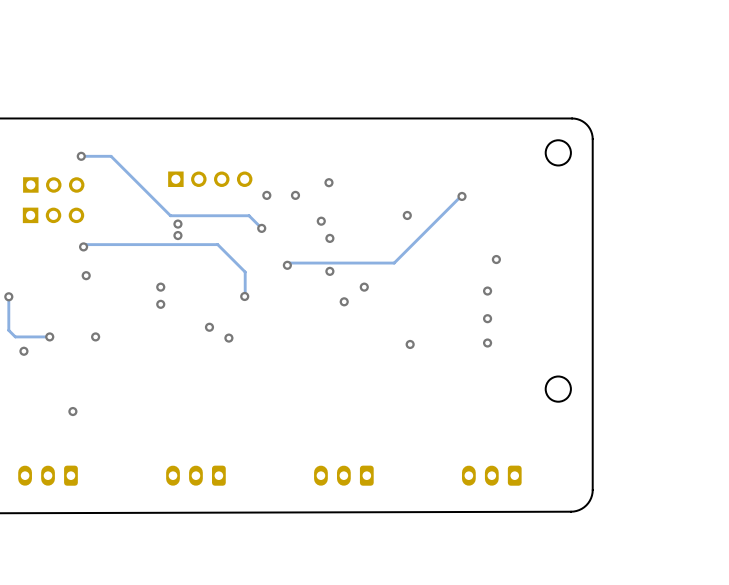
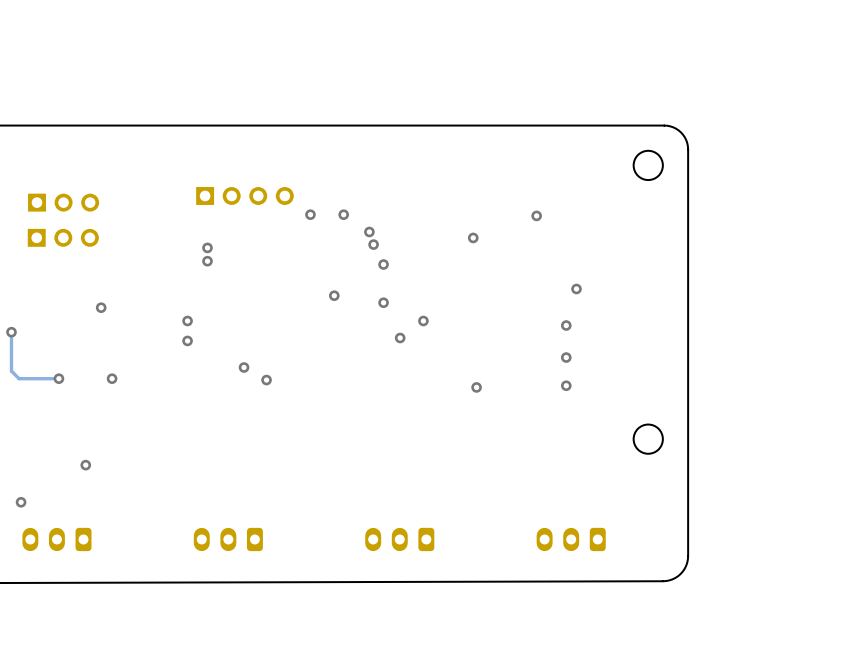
track: (81, 156) (111, 156) (170, 215) (249, 215) (261, 228) -> none
via: (81, 156) -> none
via: (328, 182) -> none
track: (461, 196) (394, 263) (289, 263) (287, 265) -> none
via: none -> (369, 231)
via: (261, 228) -> none
track: (83, 246) (85, 244) (217, 244) (245, 272) (245, 296) -> none
via: (83, 246) -> none
via: (244, 296) -> none
via: (23, 351) -> none
via: none -> (21, 502)

